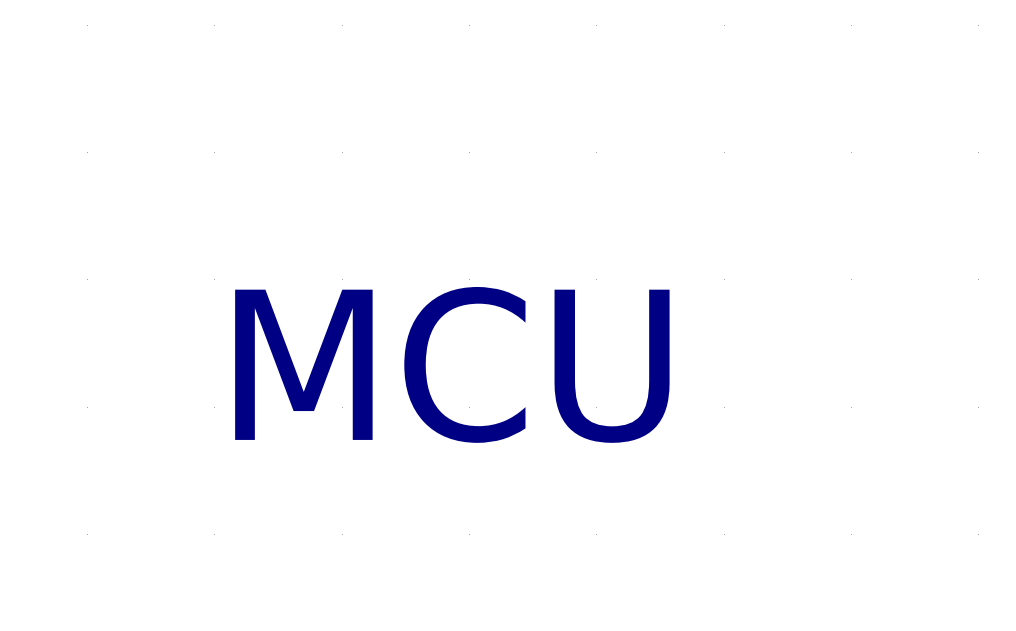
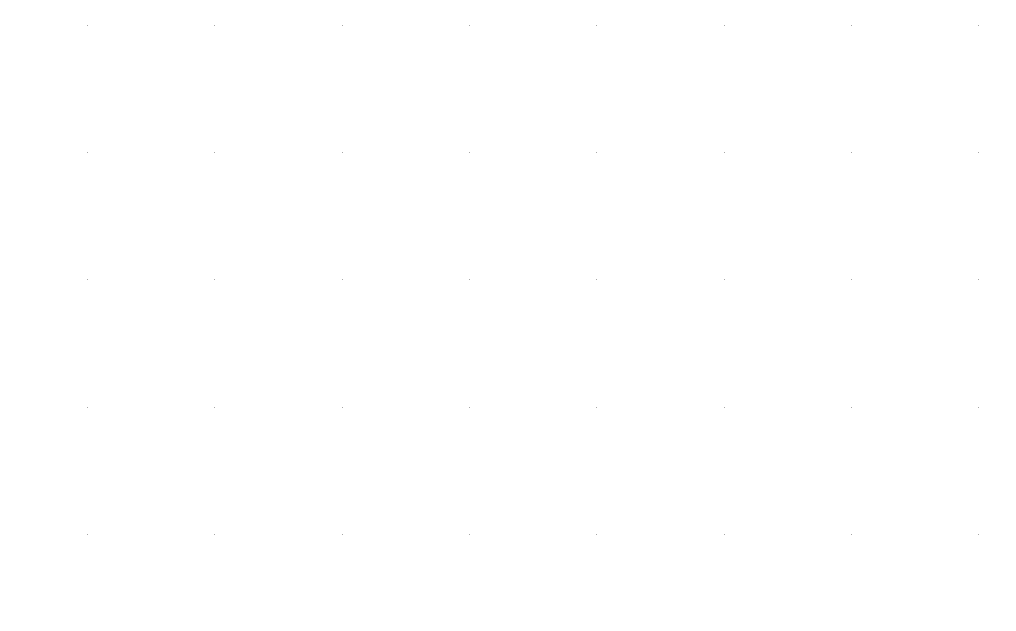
text: MCU (452, 364) -> none

